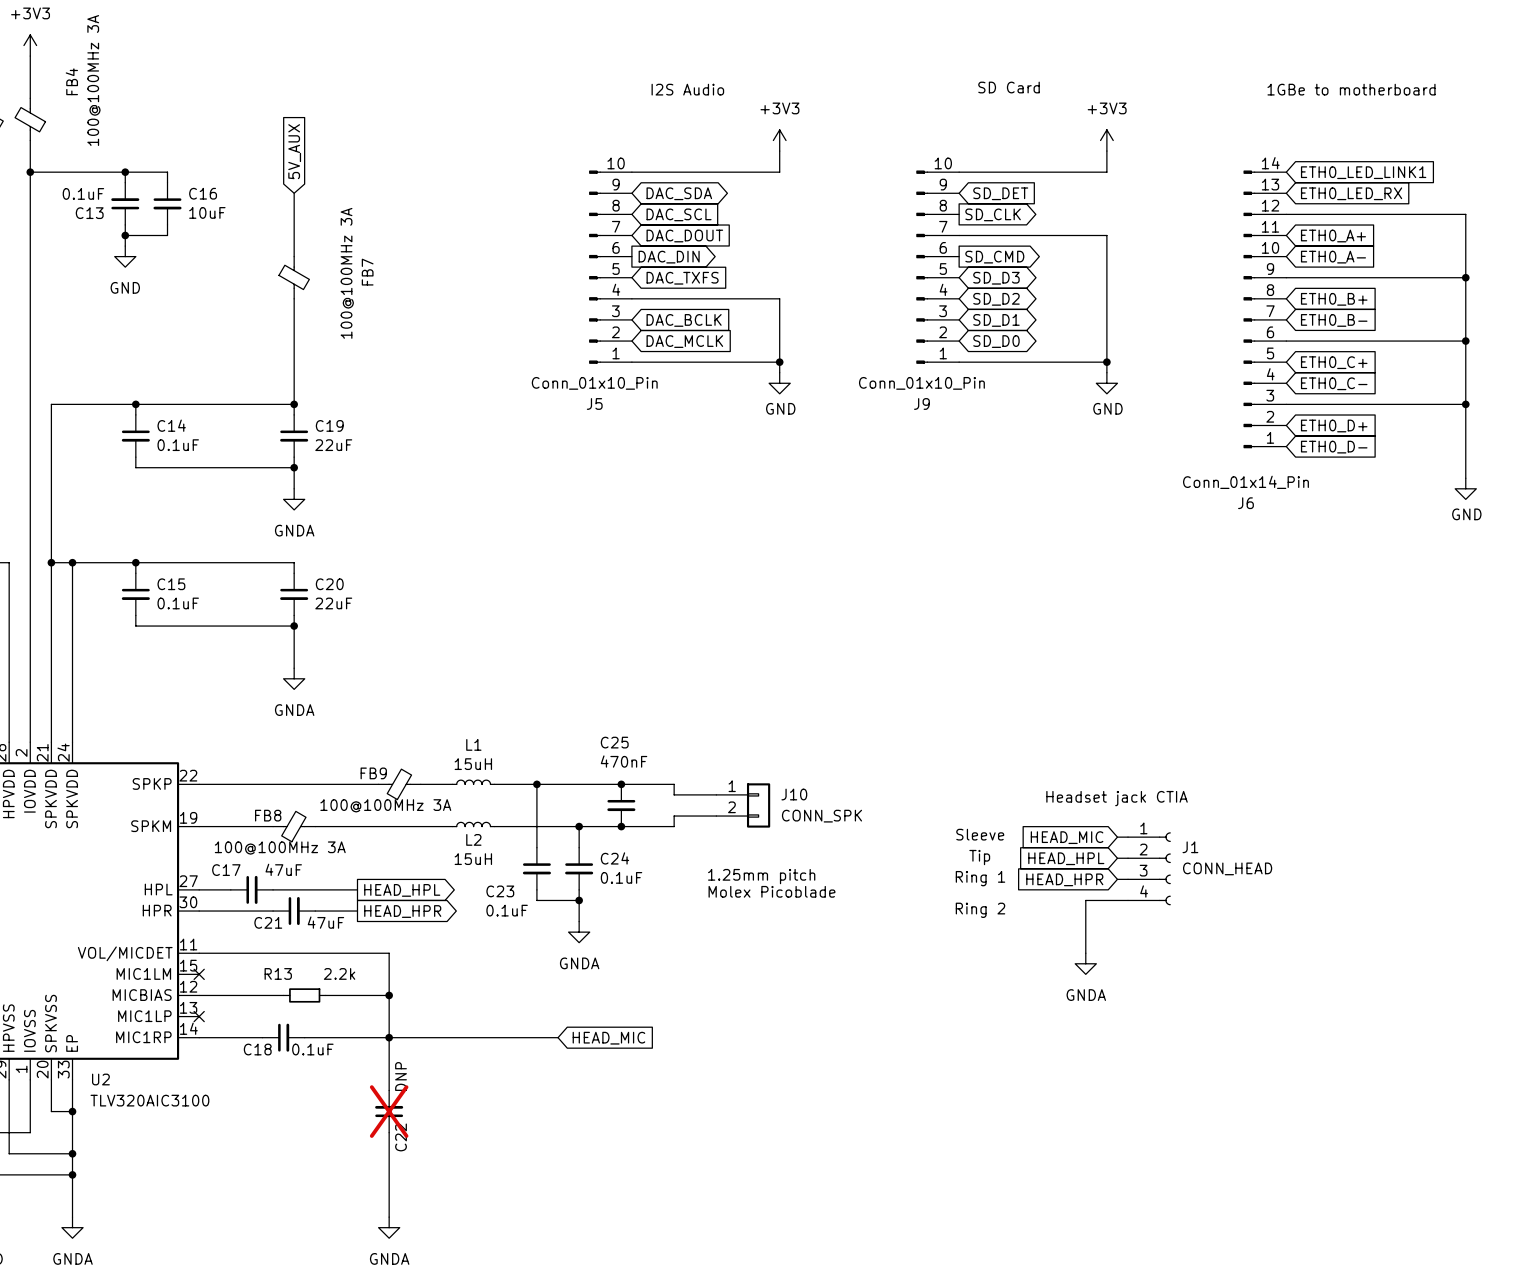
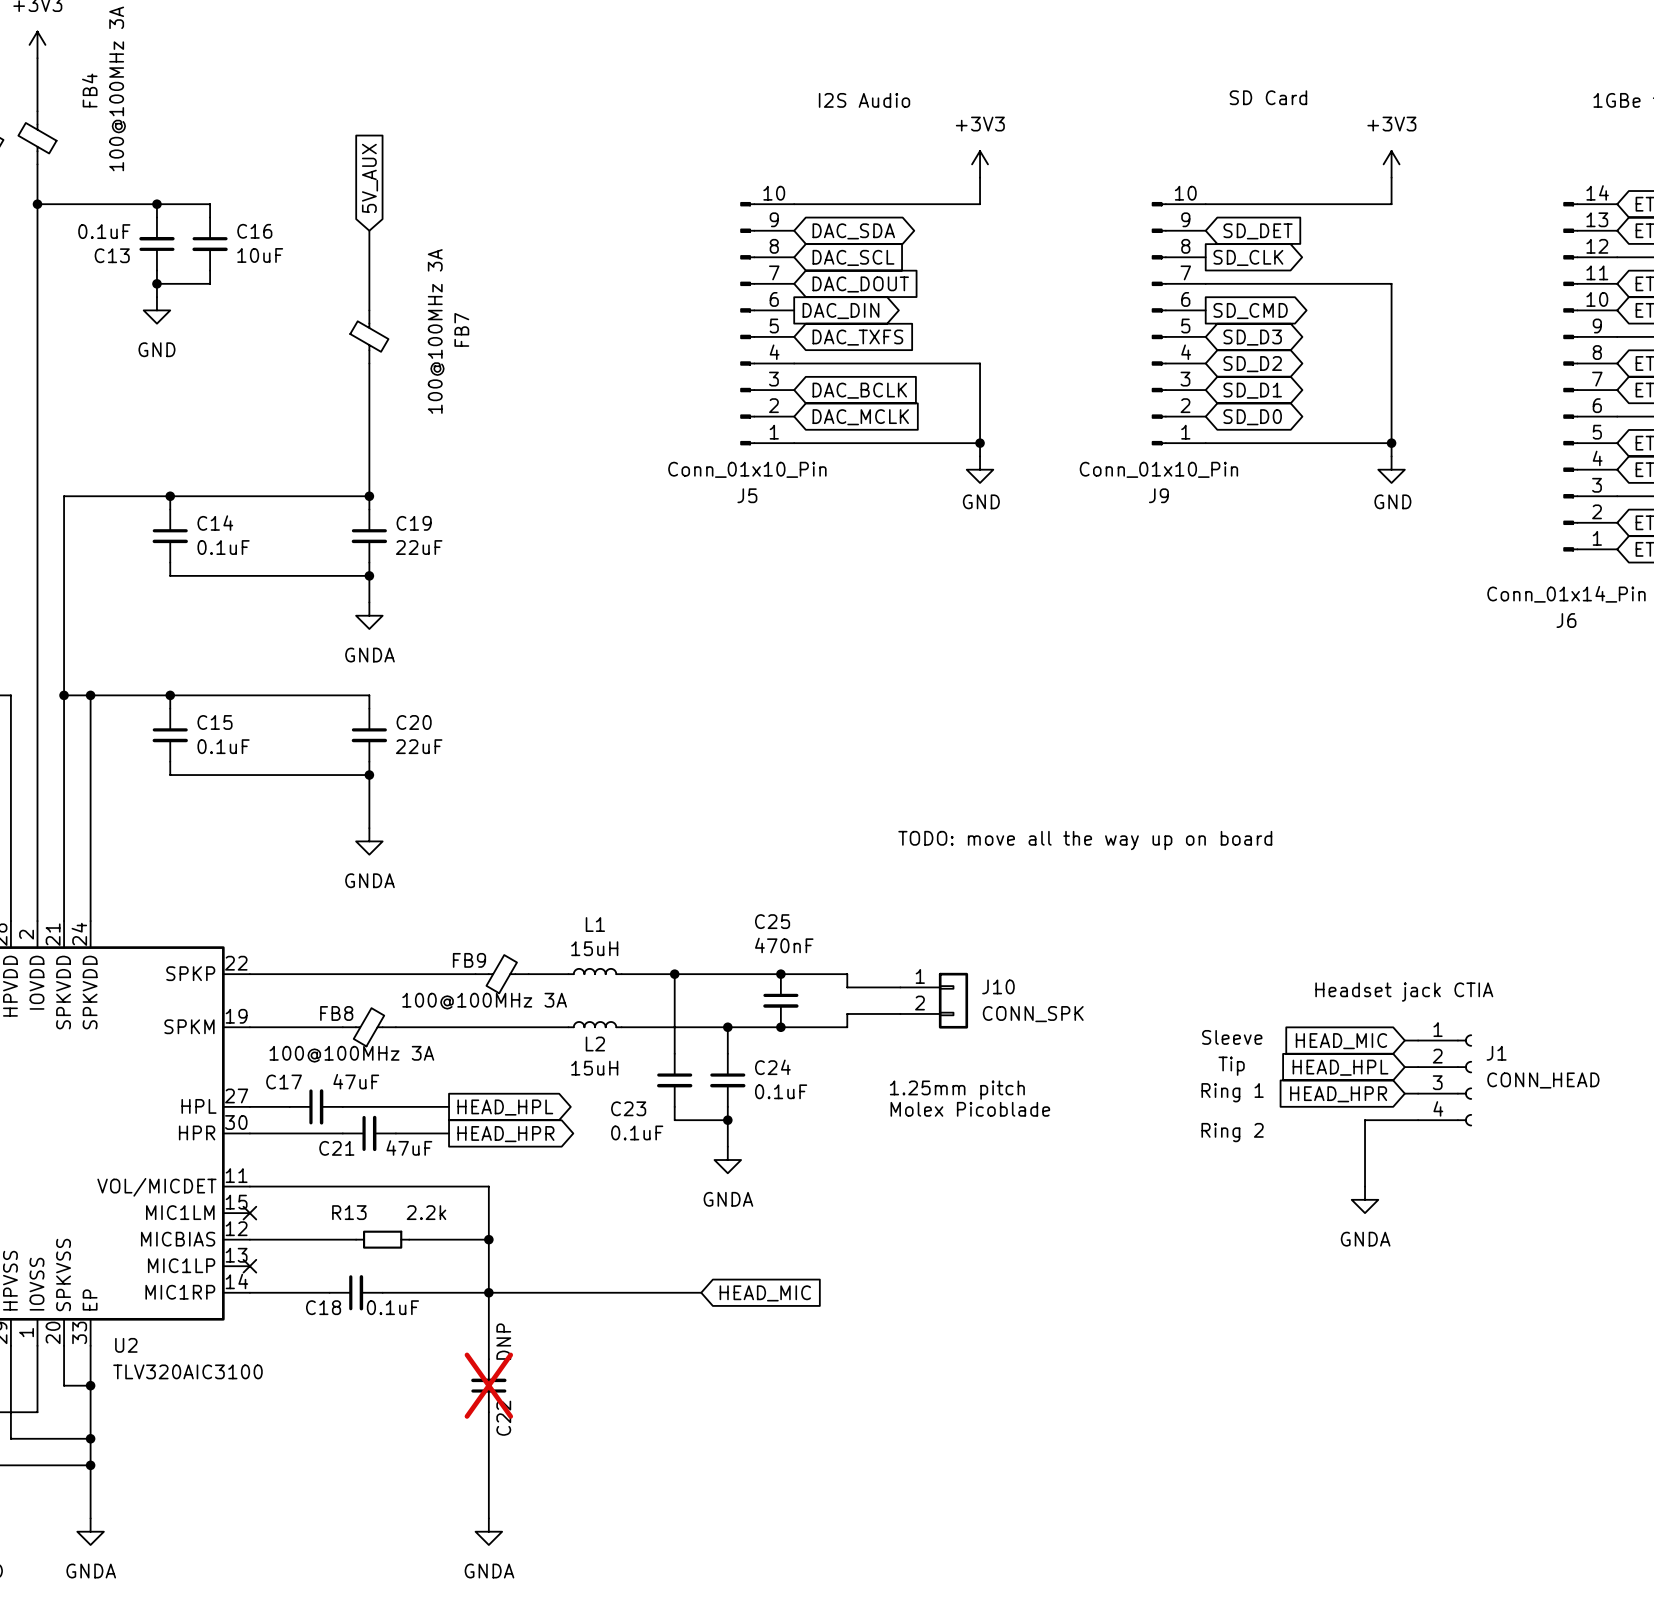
text: none -> TODO: move all the way up on board (1085, 840)

